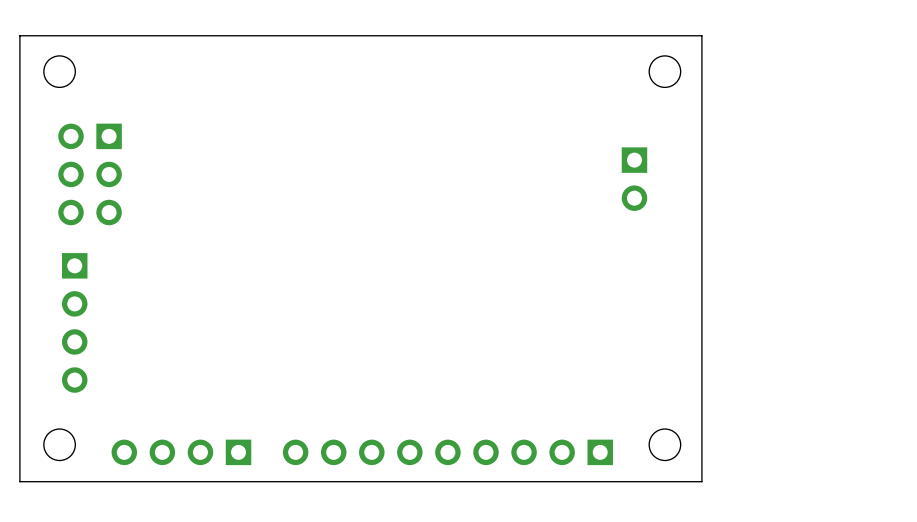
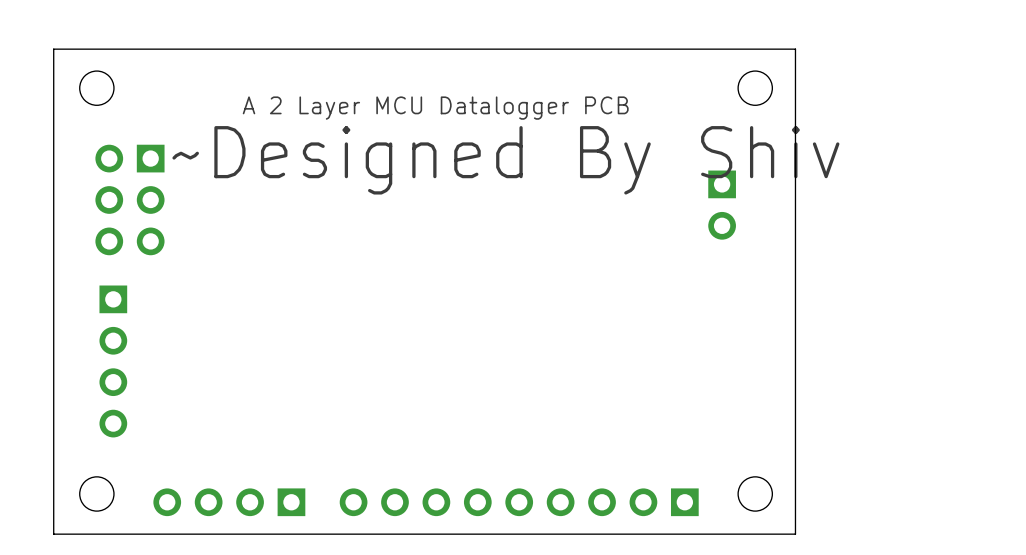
text: none -> A 2 Layer MCU Datalogger PCB (435, 108)
text: none -> ~Designed By Shiv (505, 160)

